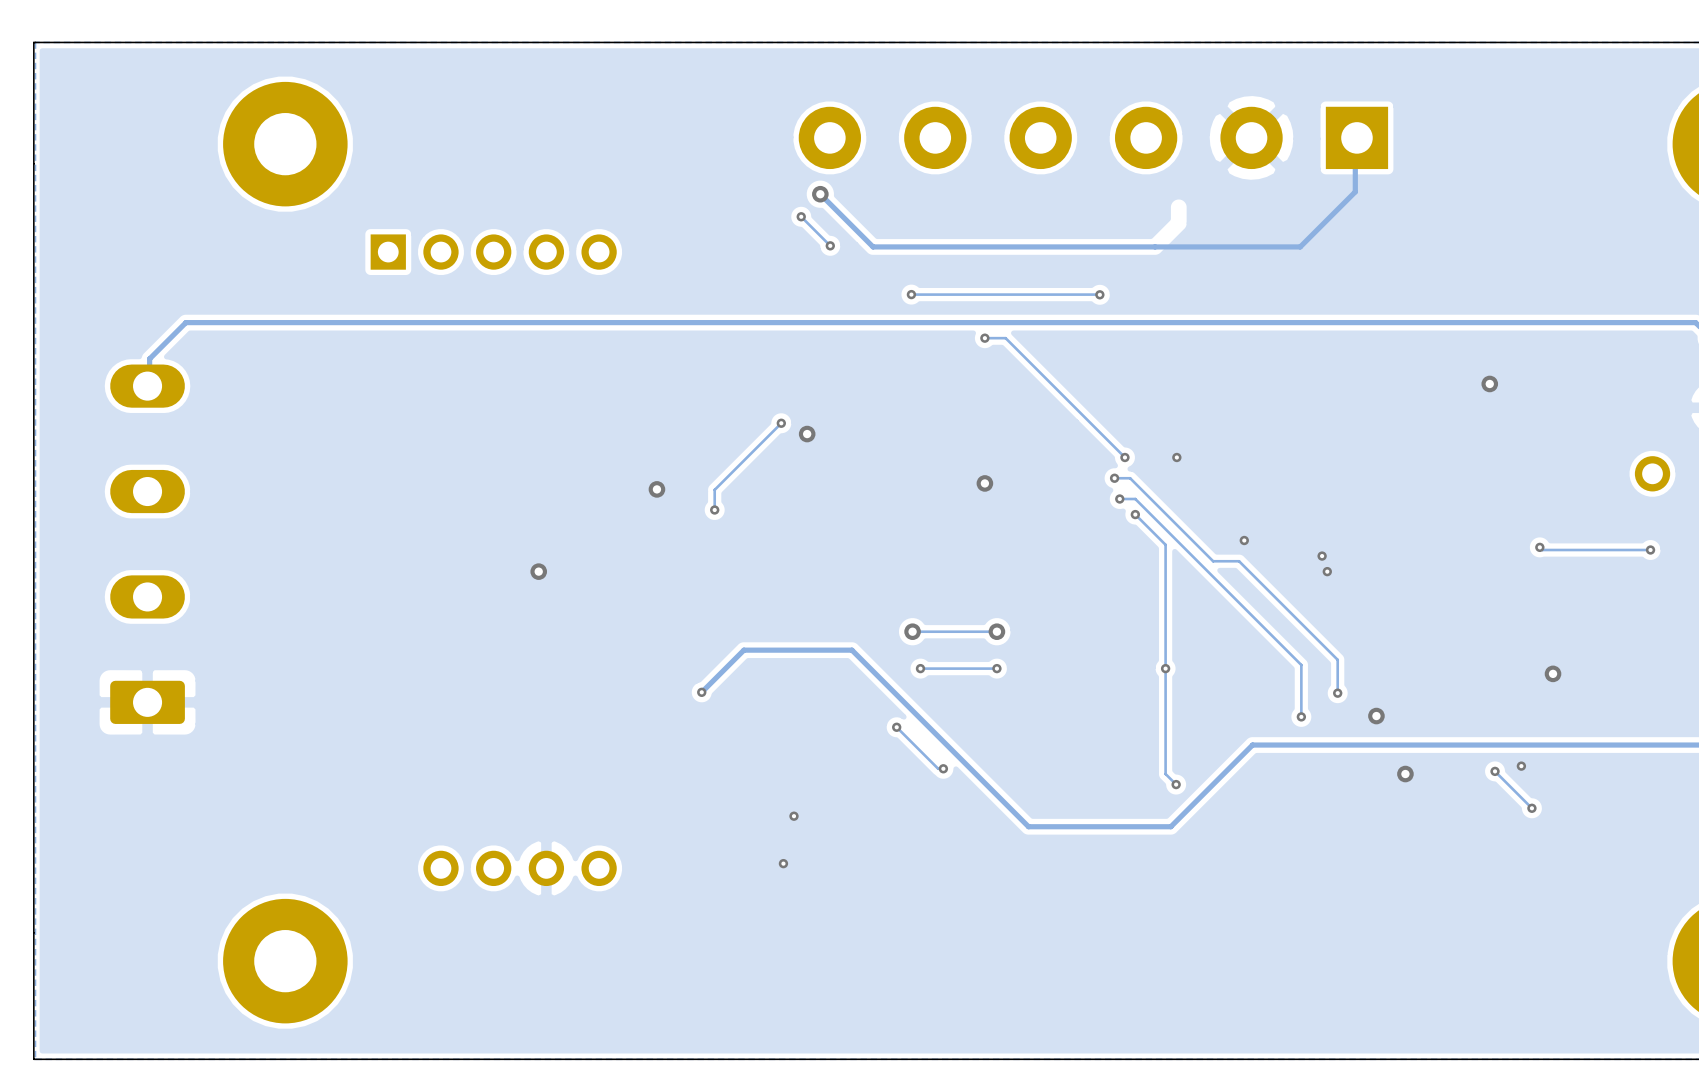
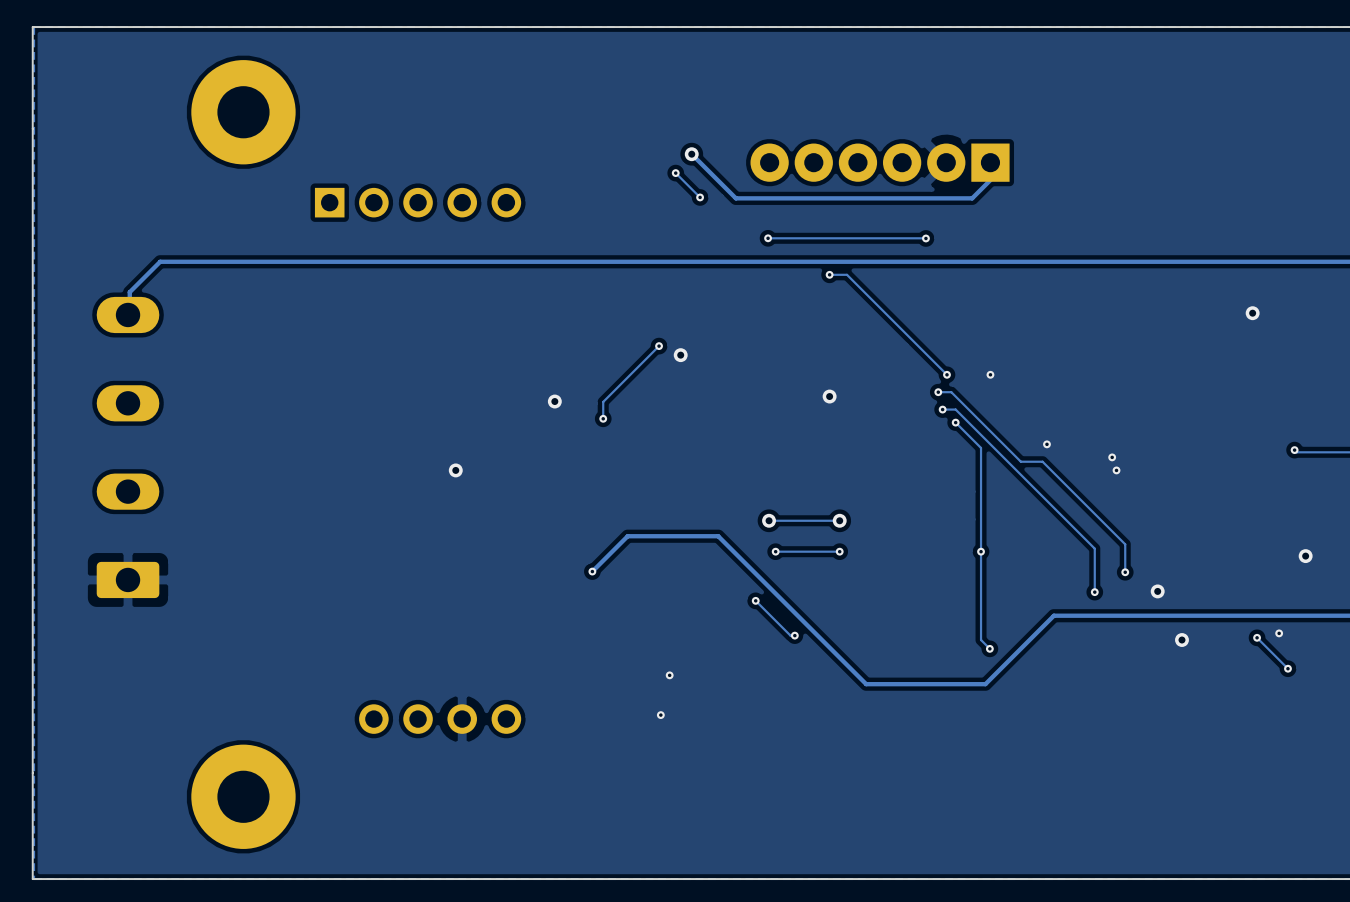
part: (1093, 137) -> none
track: (1355, 142) (1355, 191) (1300, 246) (1155, 246) -> (992, 165) (992, 178) (972, 198)
part: none -> (880, 162)

